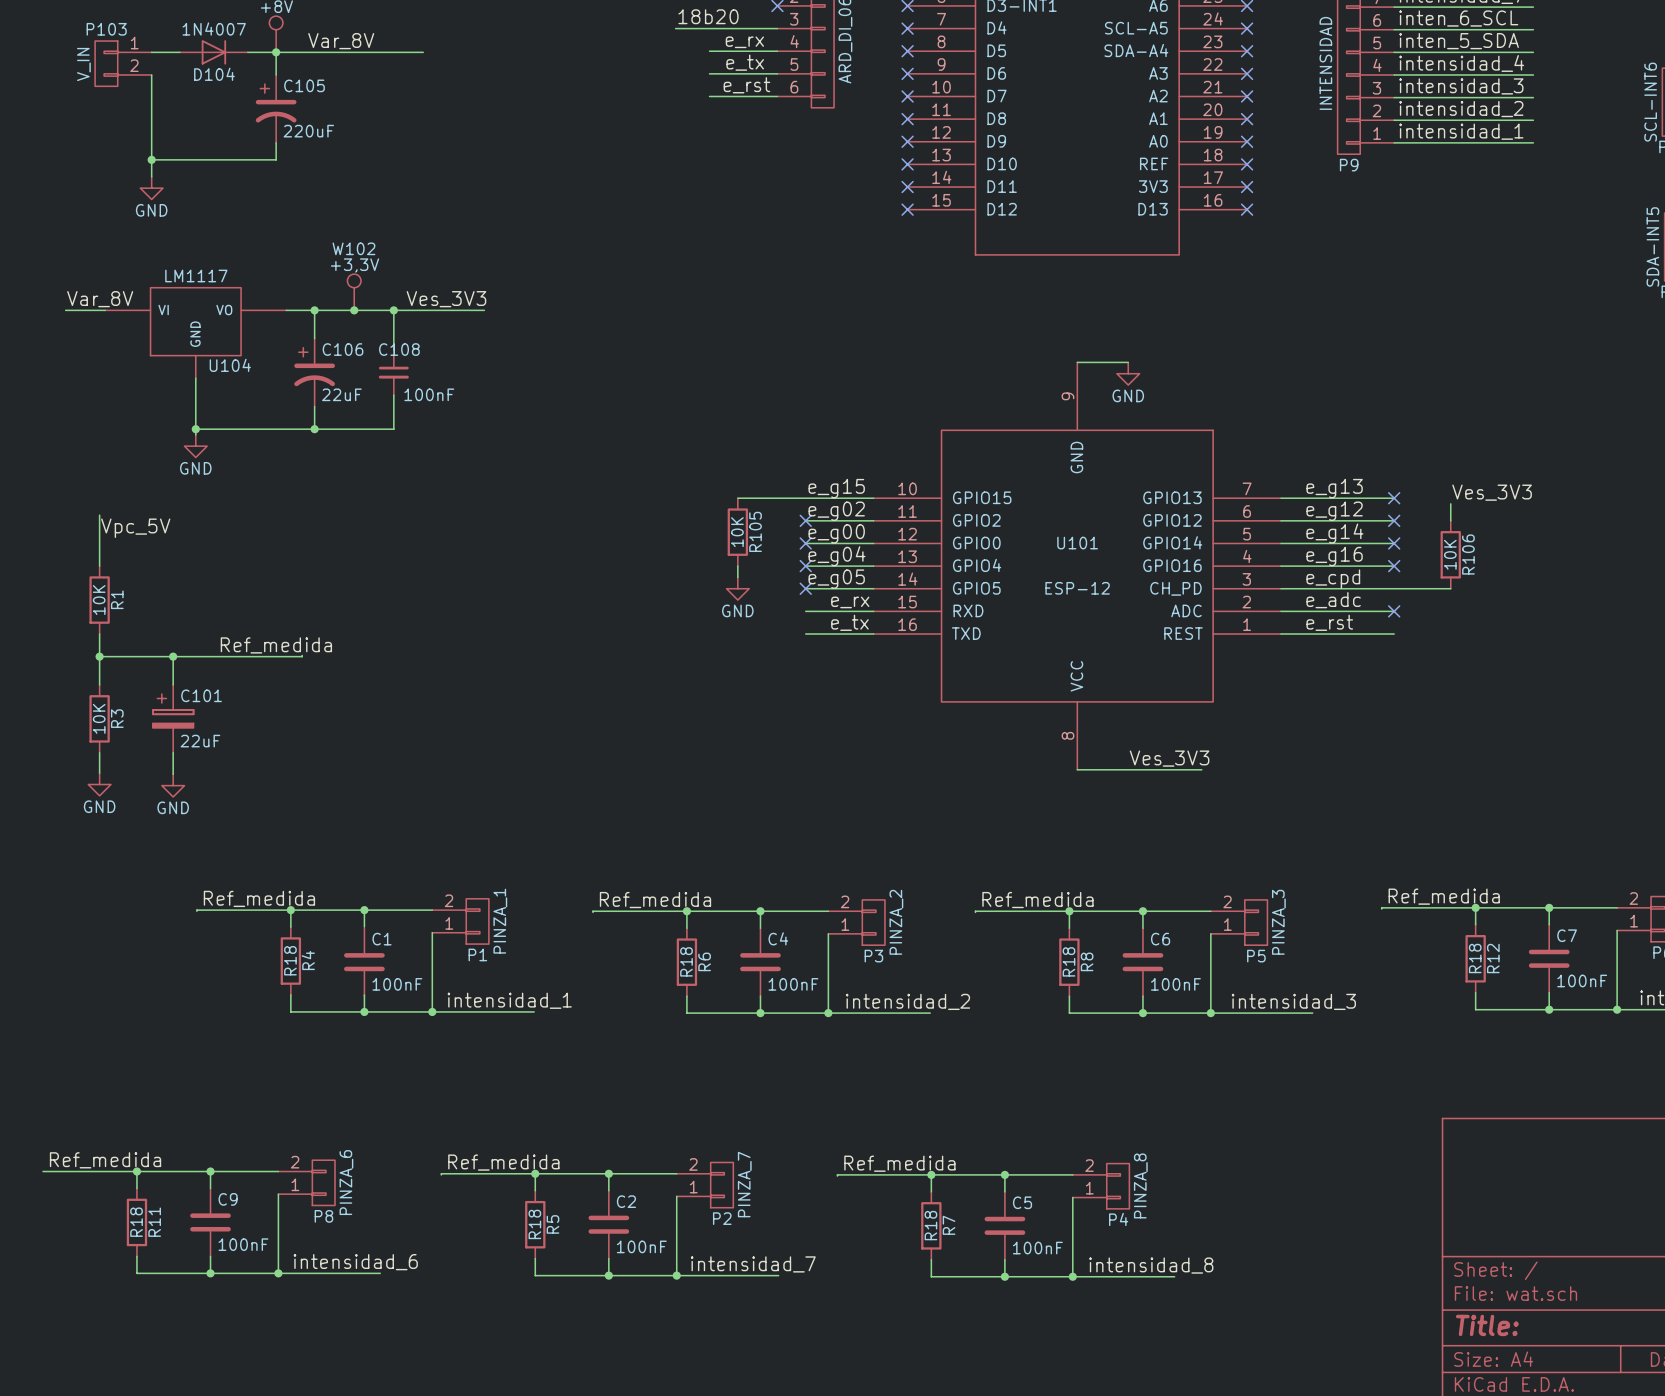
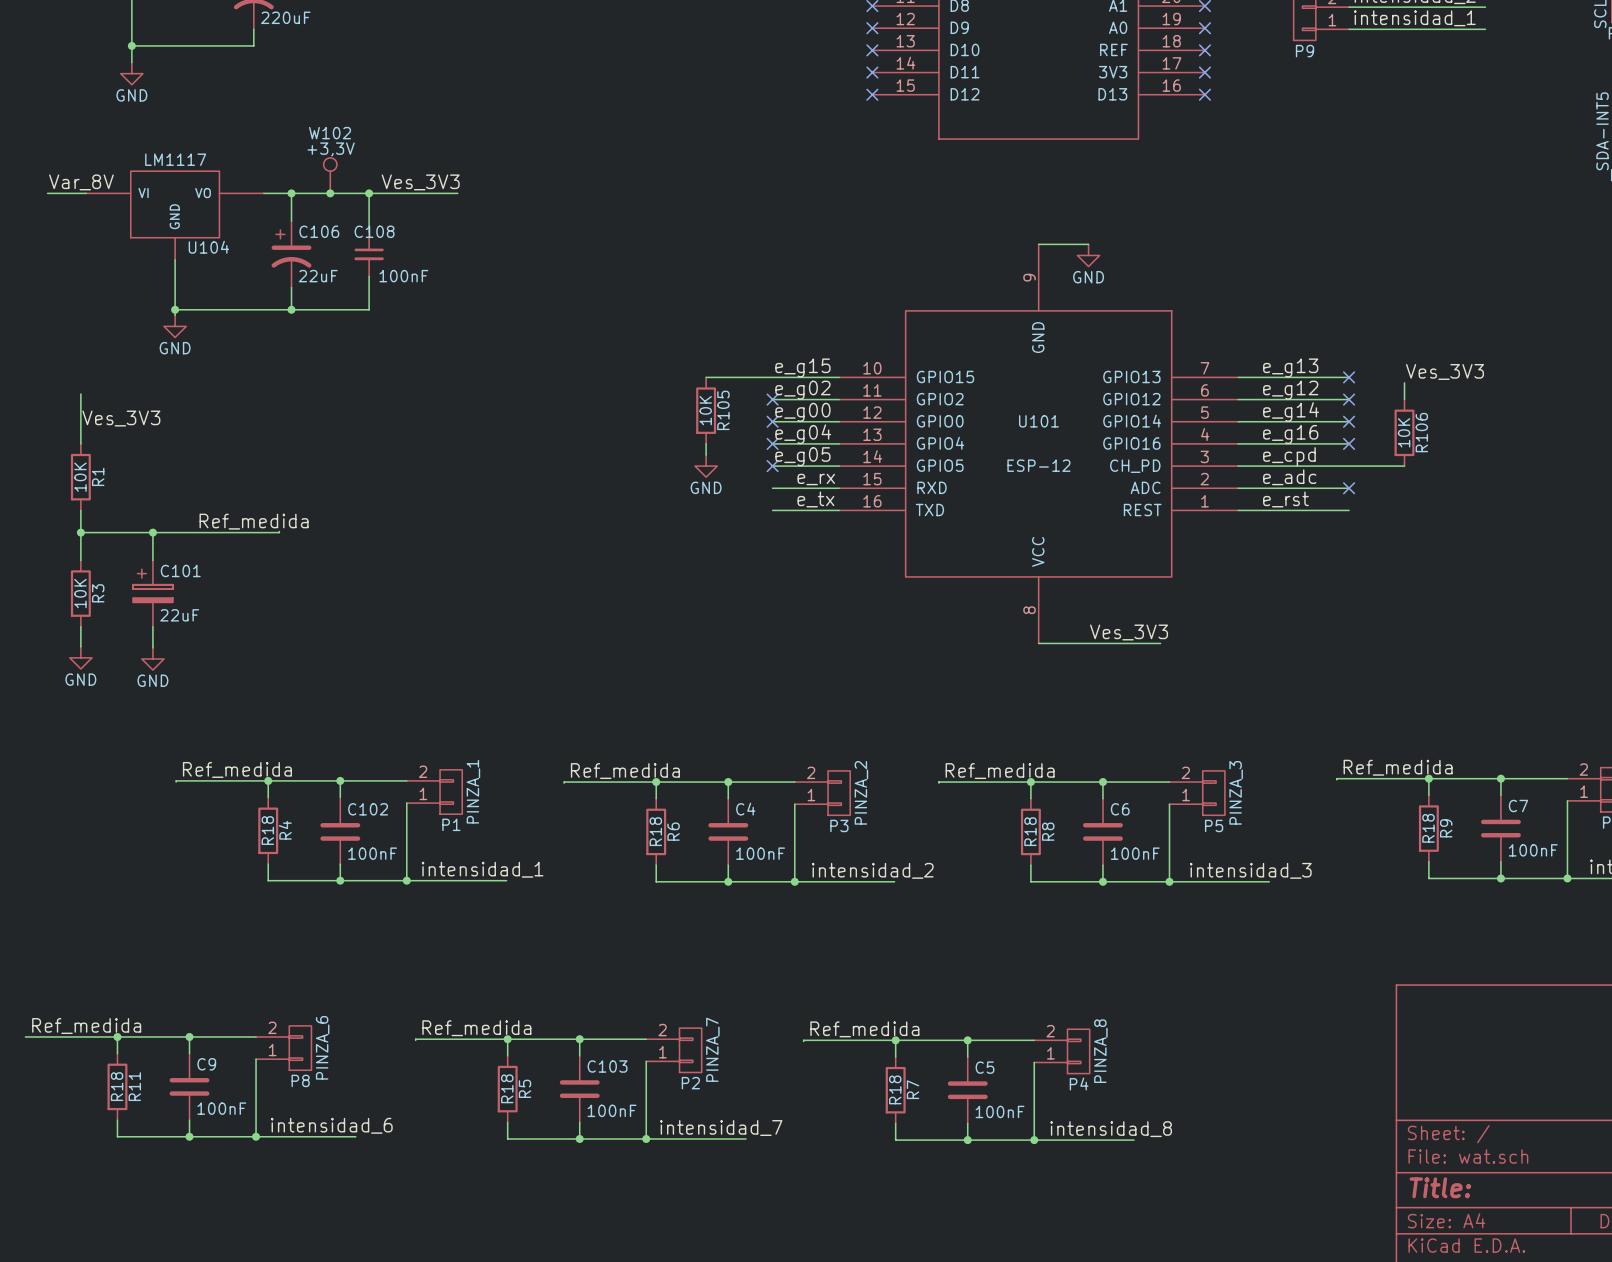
label: Vpc_5V (135, 528) -> none
label: none -> Ves_3V3 (121, 418)
C1 name: C1 (382, 939) -> C102 (368, 809)
R12 name: R12 (1493, 958) -> R9 (1446, 828)
C2 name: C2 (626, 1201) -> C103 (607, 1066)

